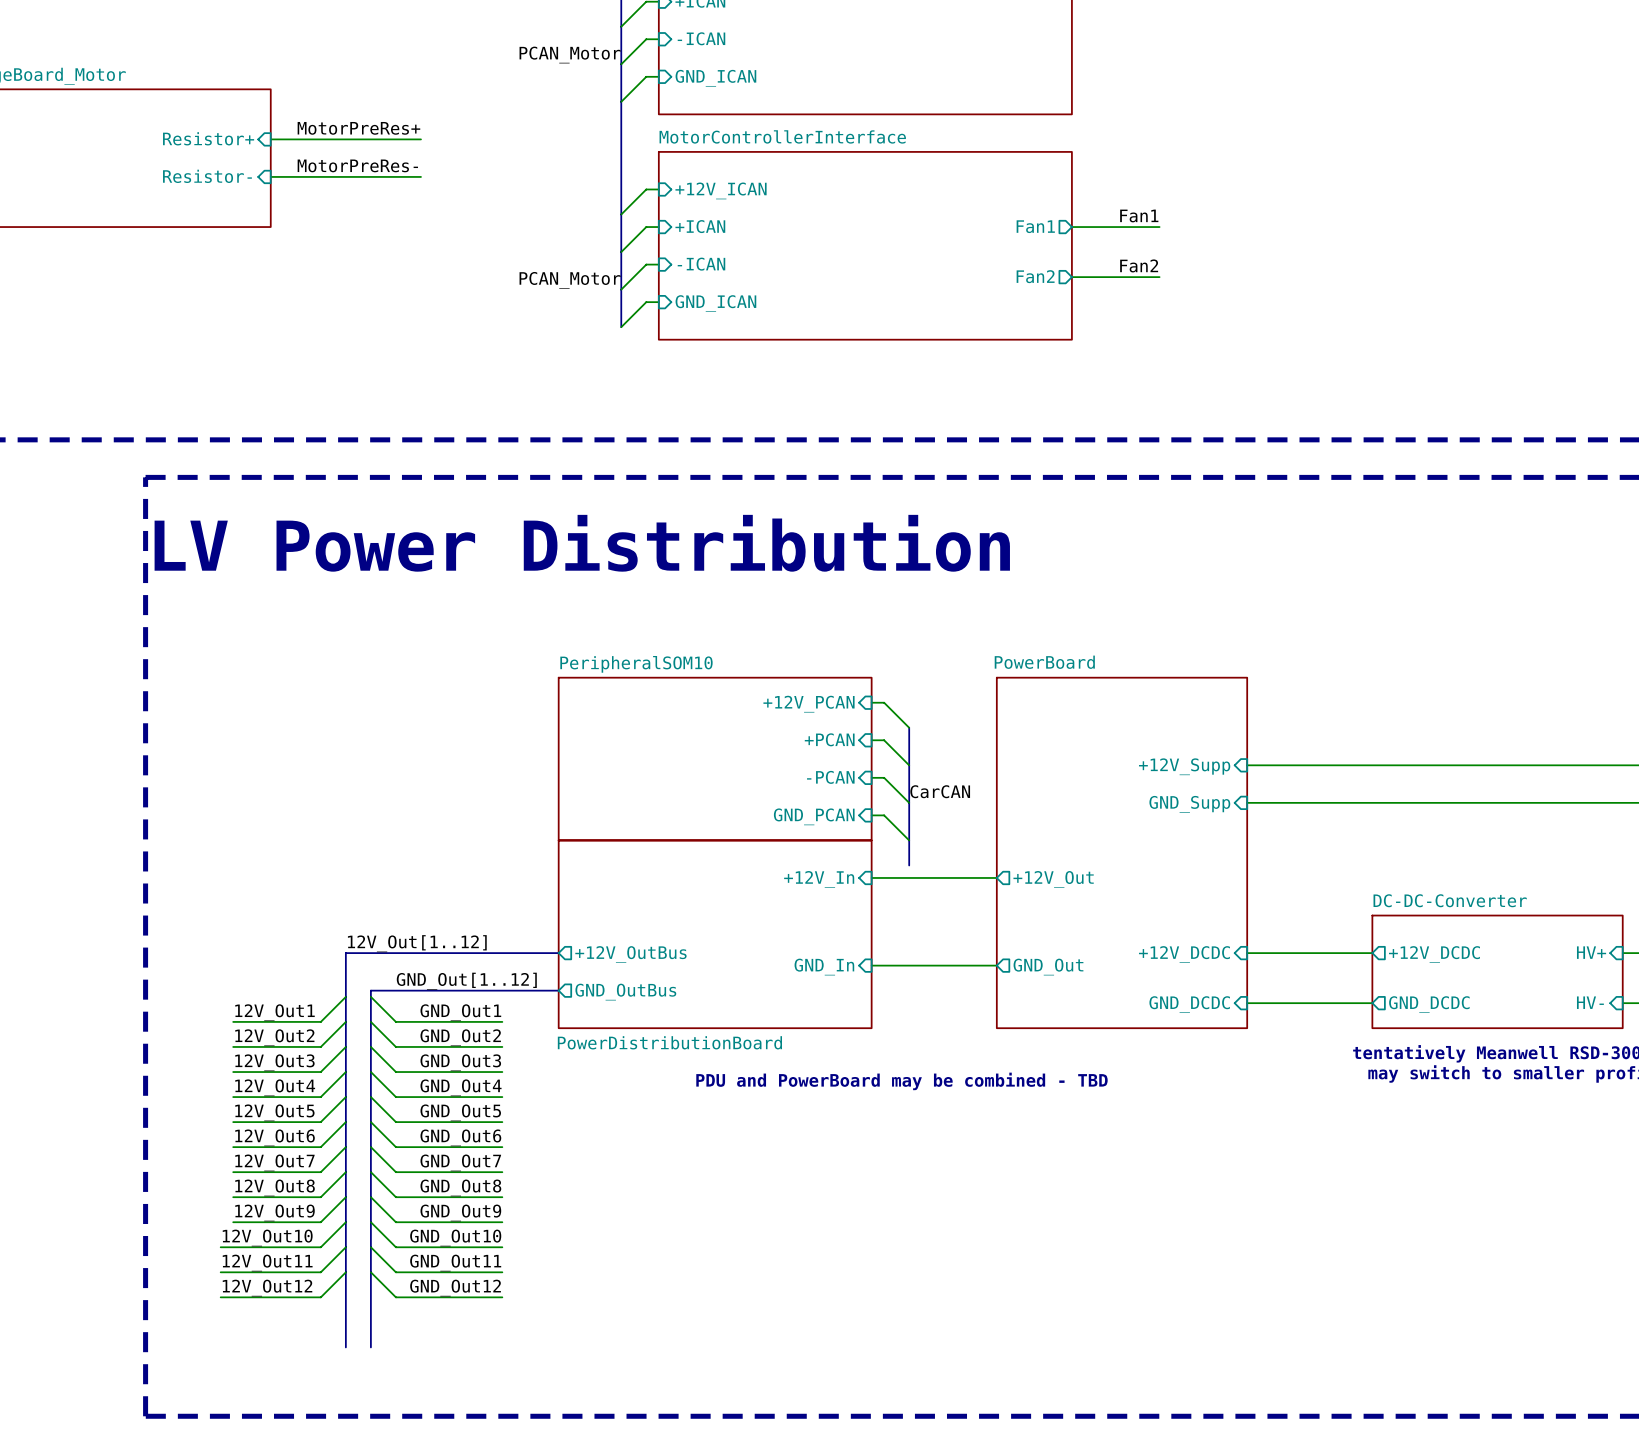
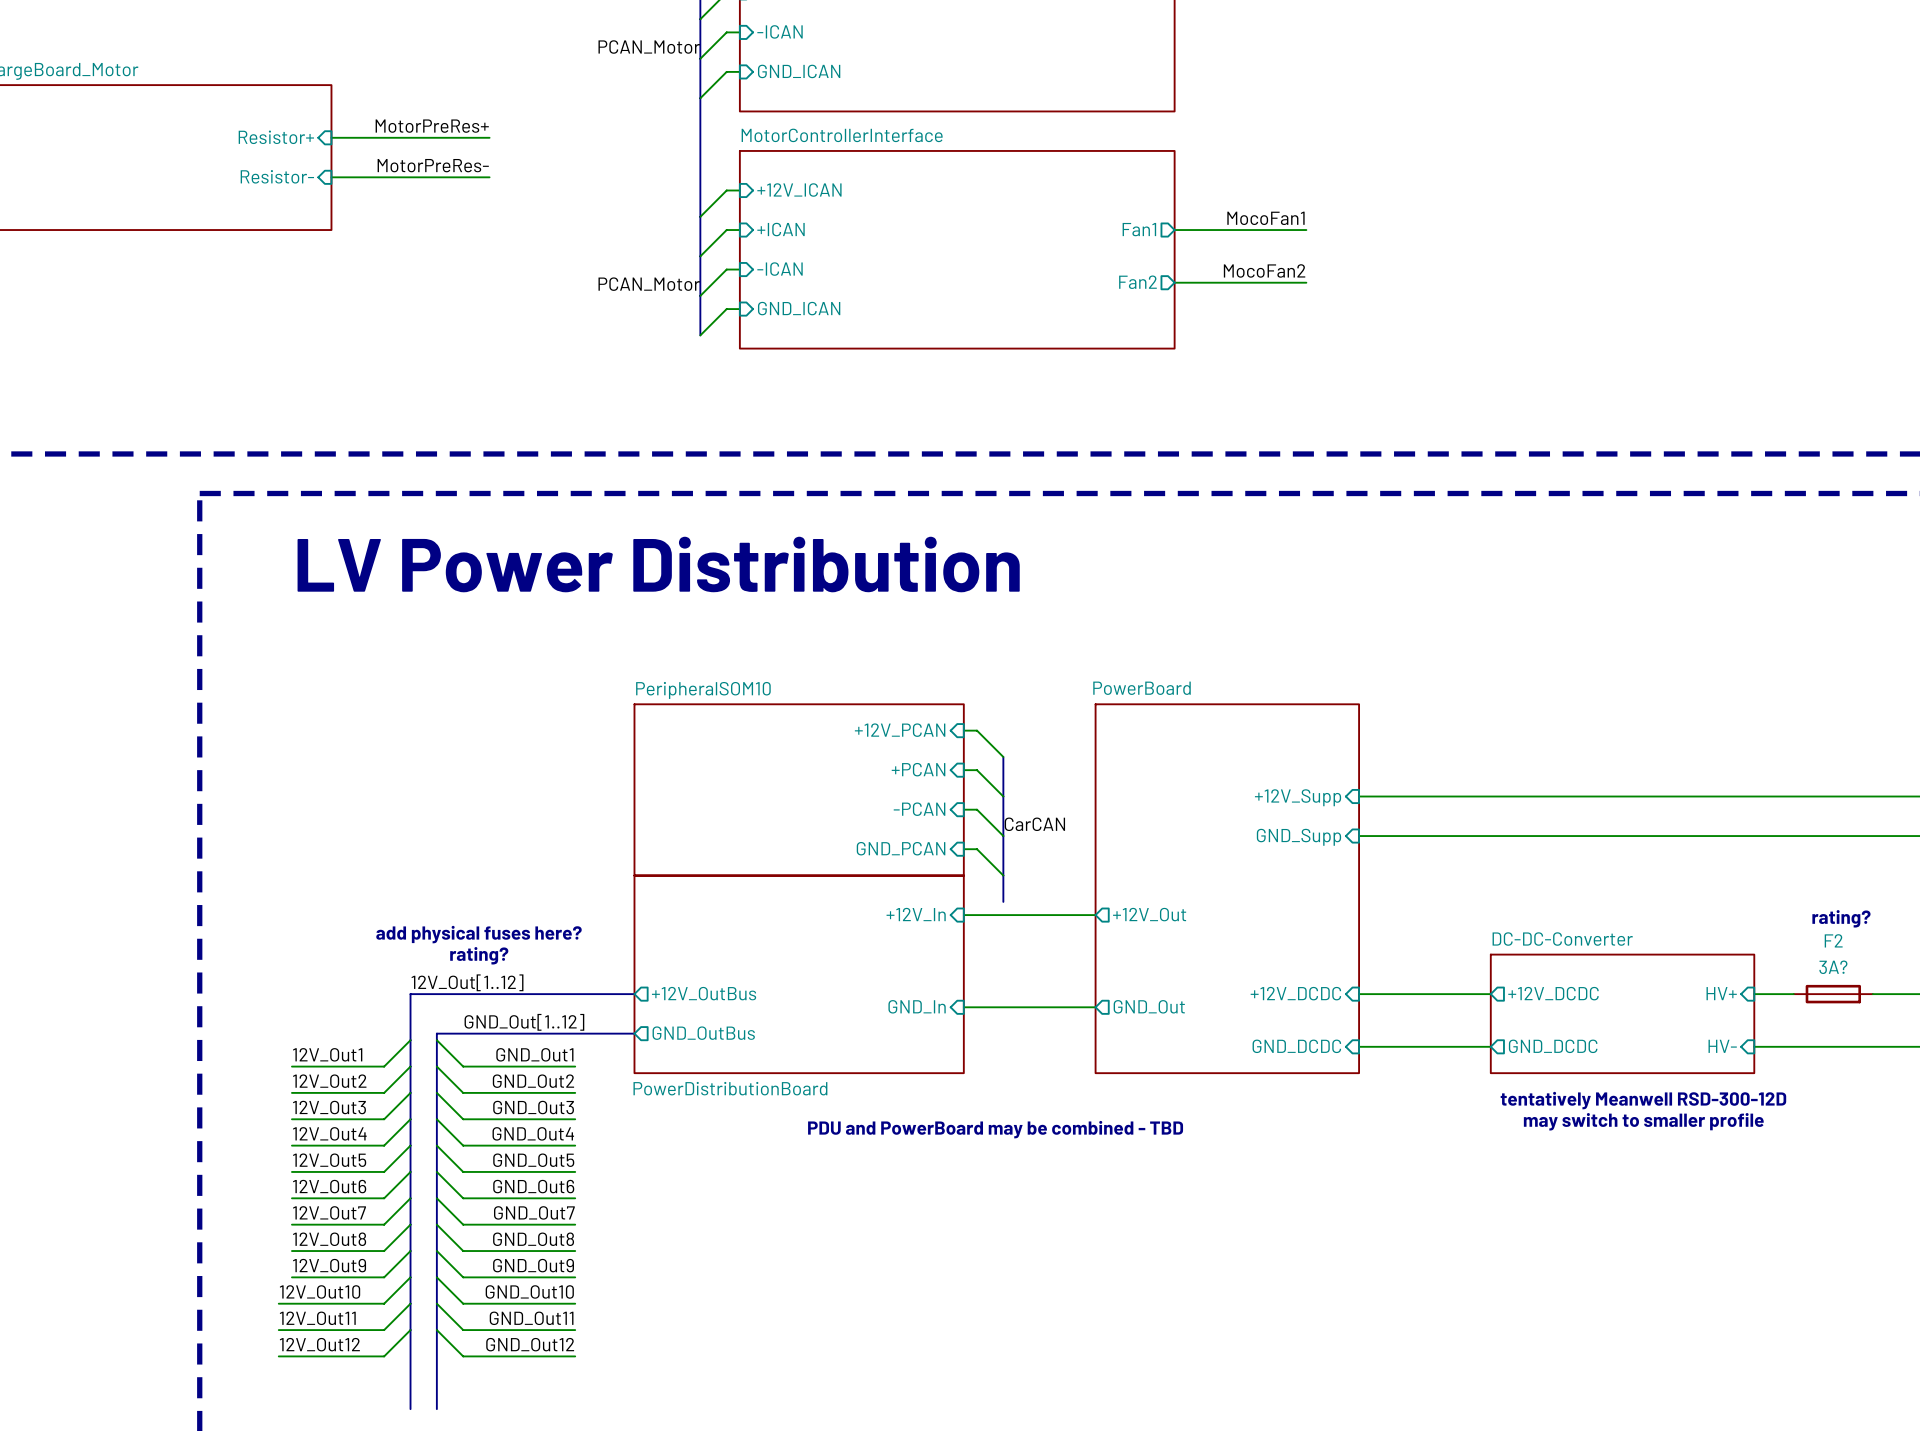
label: Fan1 (1139, 215) -> MocoFan1 (1265, 218)
wire: none -> (1266, 230) (1306, 230)
label: Fan2 (1139, 265) -> MocoFan2 (1264, 270)
wire: none -> (1266, 282) (1306, 282)
text: none -> add physical fuses here? (478, 934)
text: none -> rating? (479, 955)

